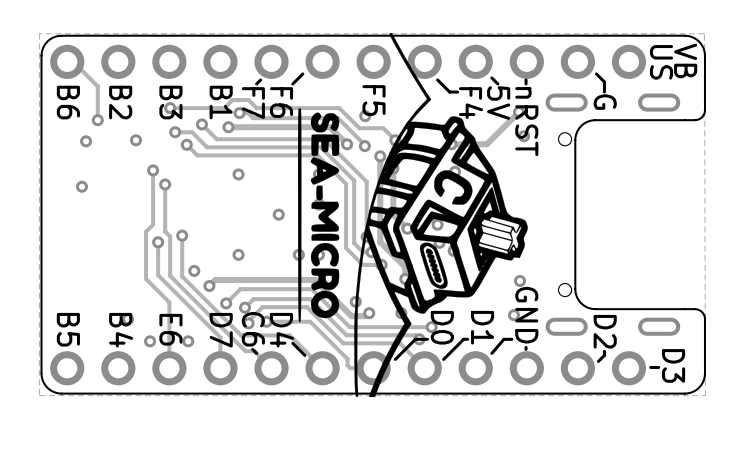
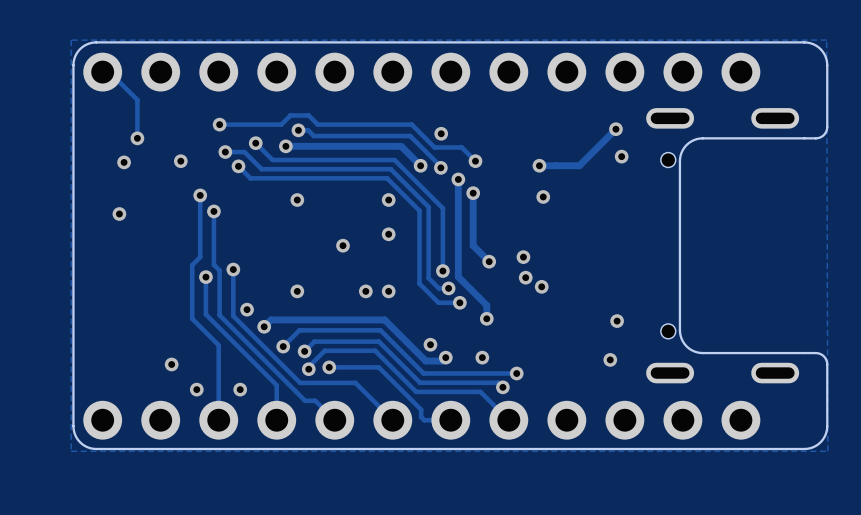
drawing: [297, 33, 528, 398] -> none
text: VB (685, 60) -> none
text: US (661, 62) -> none
line: (302, 73) (292, 83) -> none
line: (596, 73) (604, 81) (604, 92) -> none
line: (491, 77) (497, 83) -> none
line: (260, 79) (256, 83) -> none
line: (437, 79) (449, 92) (457, 92) -> none
line: (526, 79) (526, 83) -> none
text: F5 (374, 100) -> none
text: B6 (68, 102) -> none
text: B2 (120, 102) -> none
text: B3 (170, 102) -> none
text: B1 (221, 102) -> none
text: F6 (281, 102) -> none
text: G (605, 102) -> none
text: F7 (253, 103) -> none
text: F4 (470, 103) -> none
text: 5V (498, 103) -> none
text: nRST (526, 121) -> none
text: GND (526, 315) -> none
text: D0 (442, 327) -> none
text: D1 (482, 327) -> none
text: B5 (68, 329) -> none
text: E6 (170, 329) -> none
text: C6 (253, 329) -> none
text: B4 (121, 330) -> none
text: D7 (221, 330) -> none
text: D4 (281, 330) -> none
text: D2 (605, 331) -> none
line: (427, 339) (415, 339) (395, 359) -> none
line: (467, 339) (463, 339) (443, 359) -> none
line: (511, 339) (503, 339) (491, 353) -> none
line: (292, 343) (304, 355) -> none
line: (526, 347) (526, 349) -> none
line: (252, 349) (256, 353) -> none
line: (604, 351) (604, 355) (598, 361) -> none
text: D3 (673, 365) -> none
line: (658, 367) (650, 367) -> none

